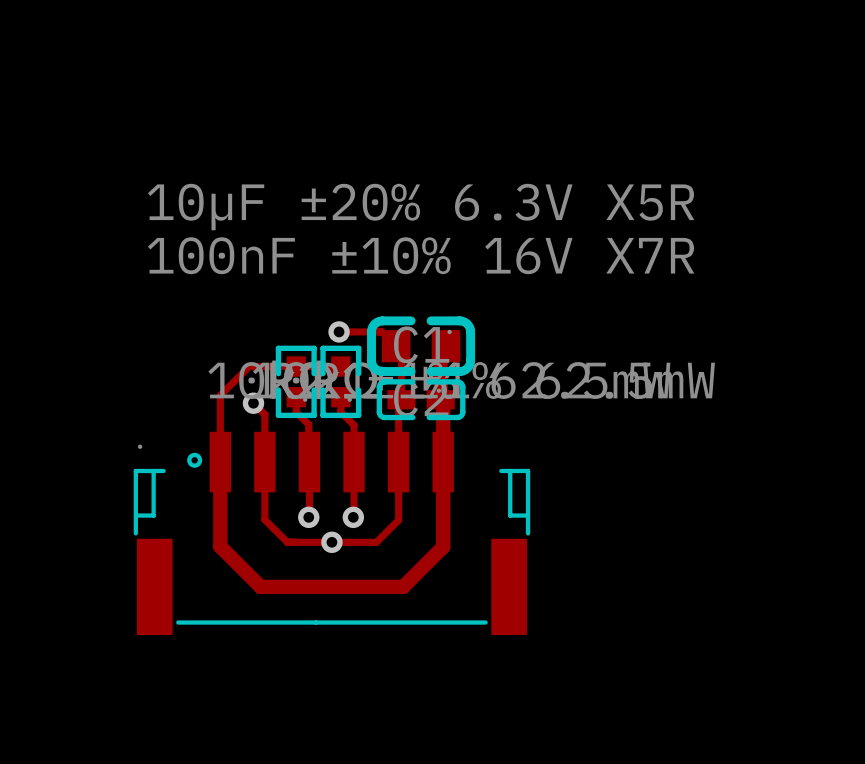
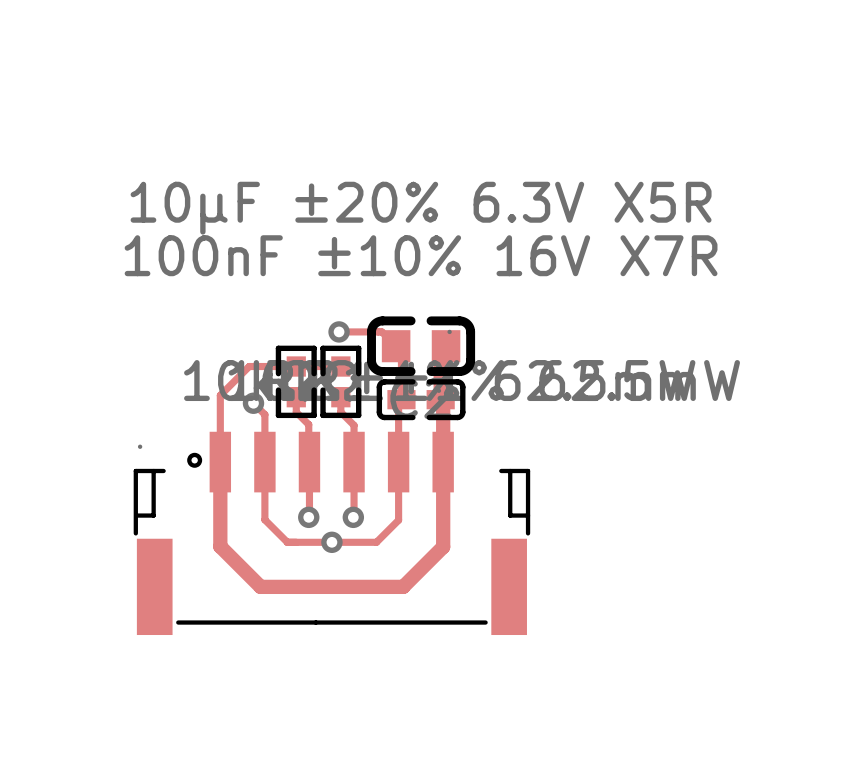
C1 name: C1 (421, 344) -> none

